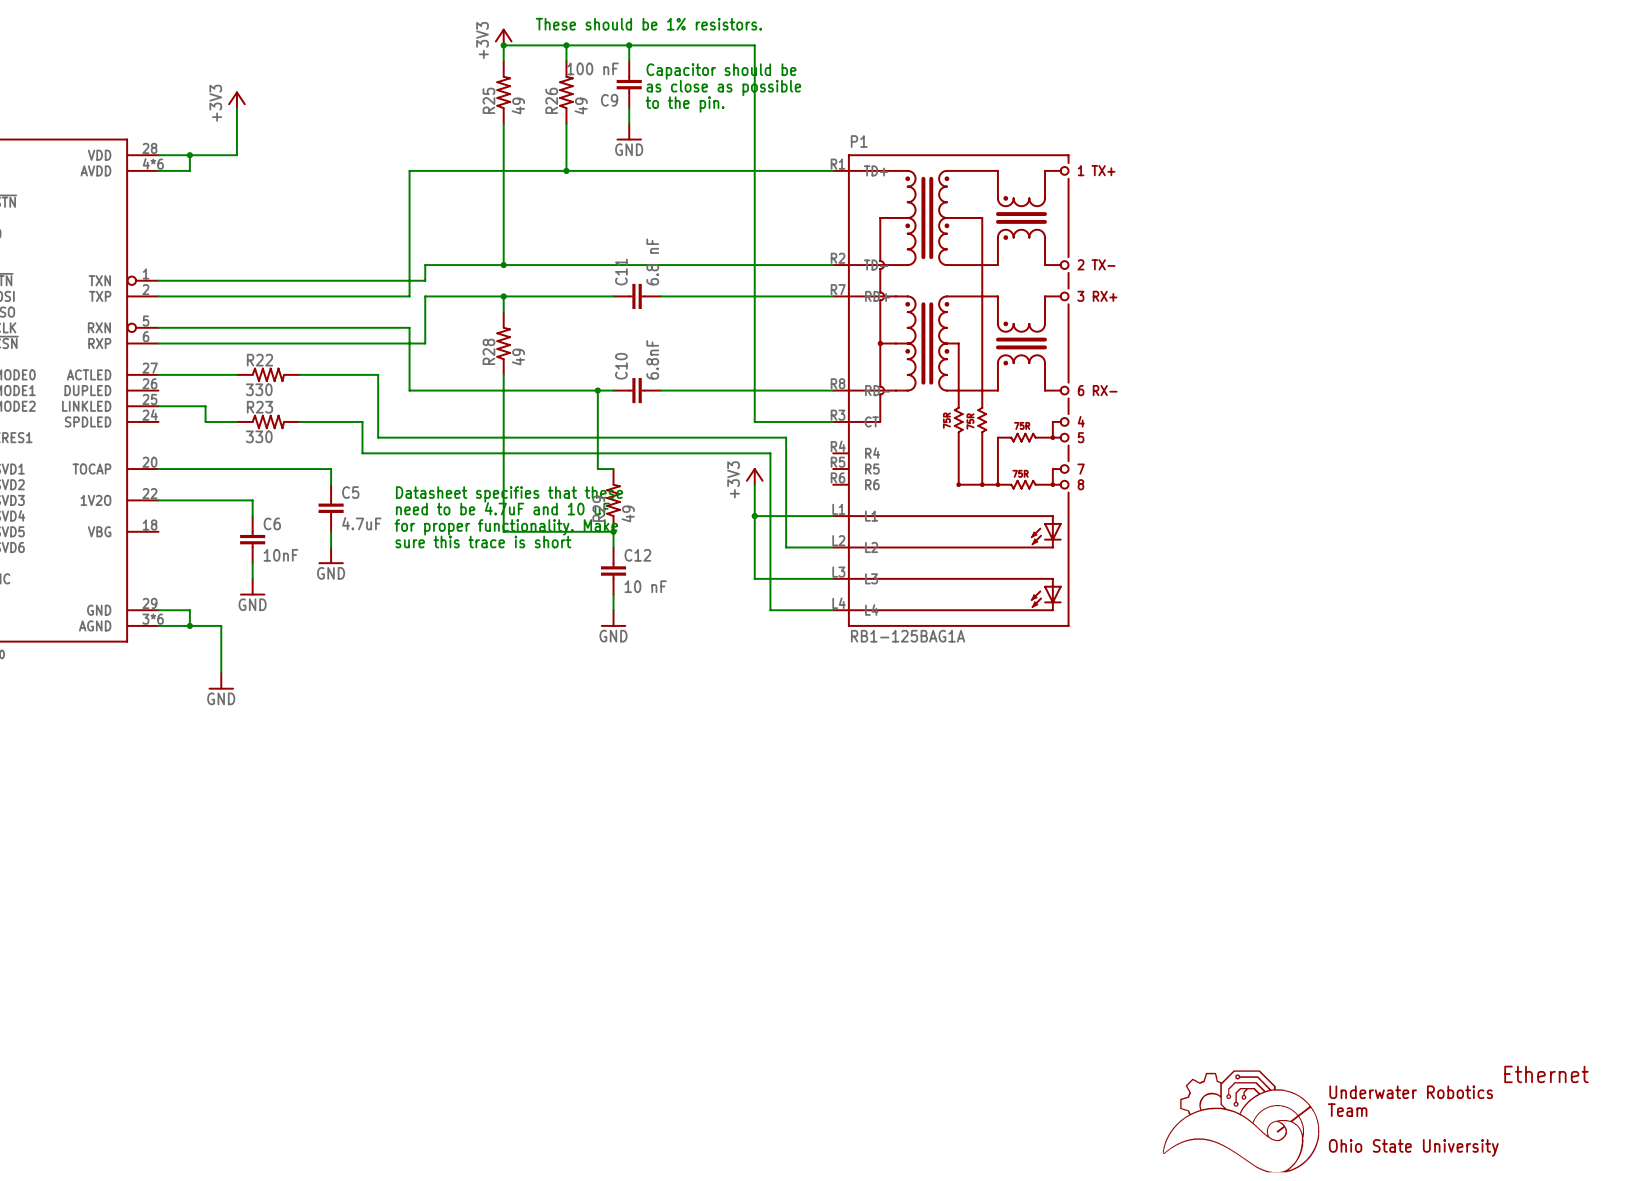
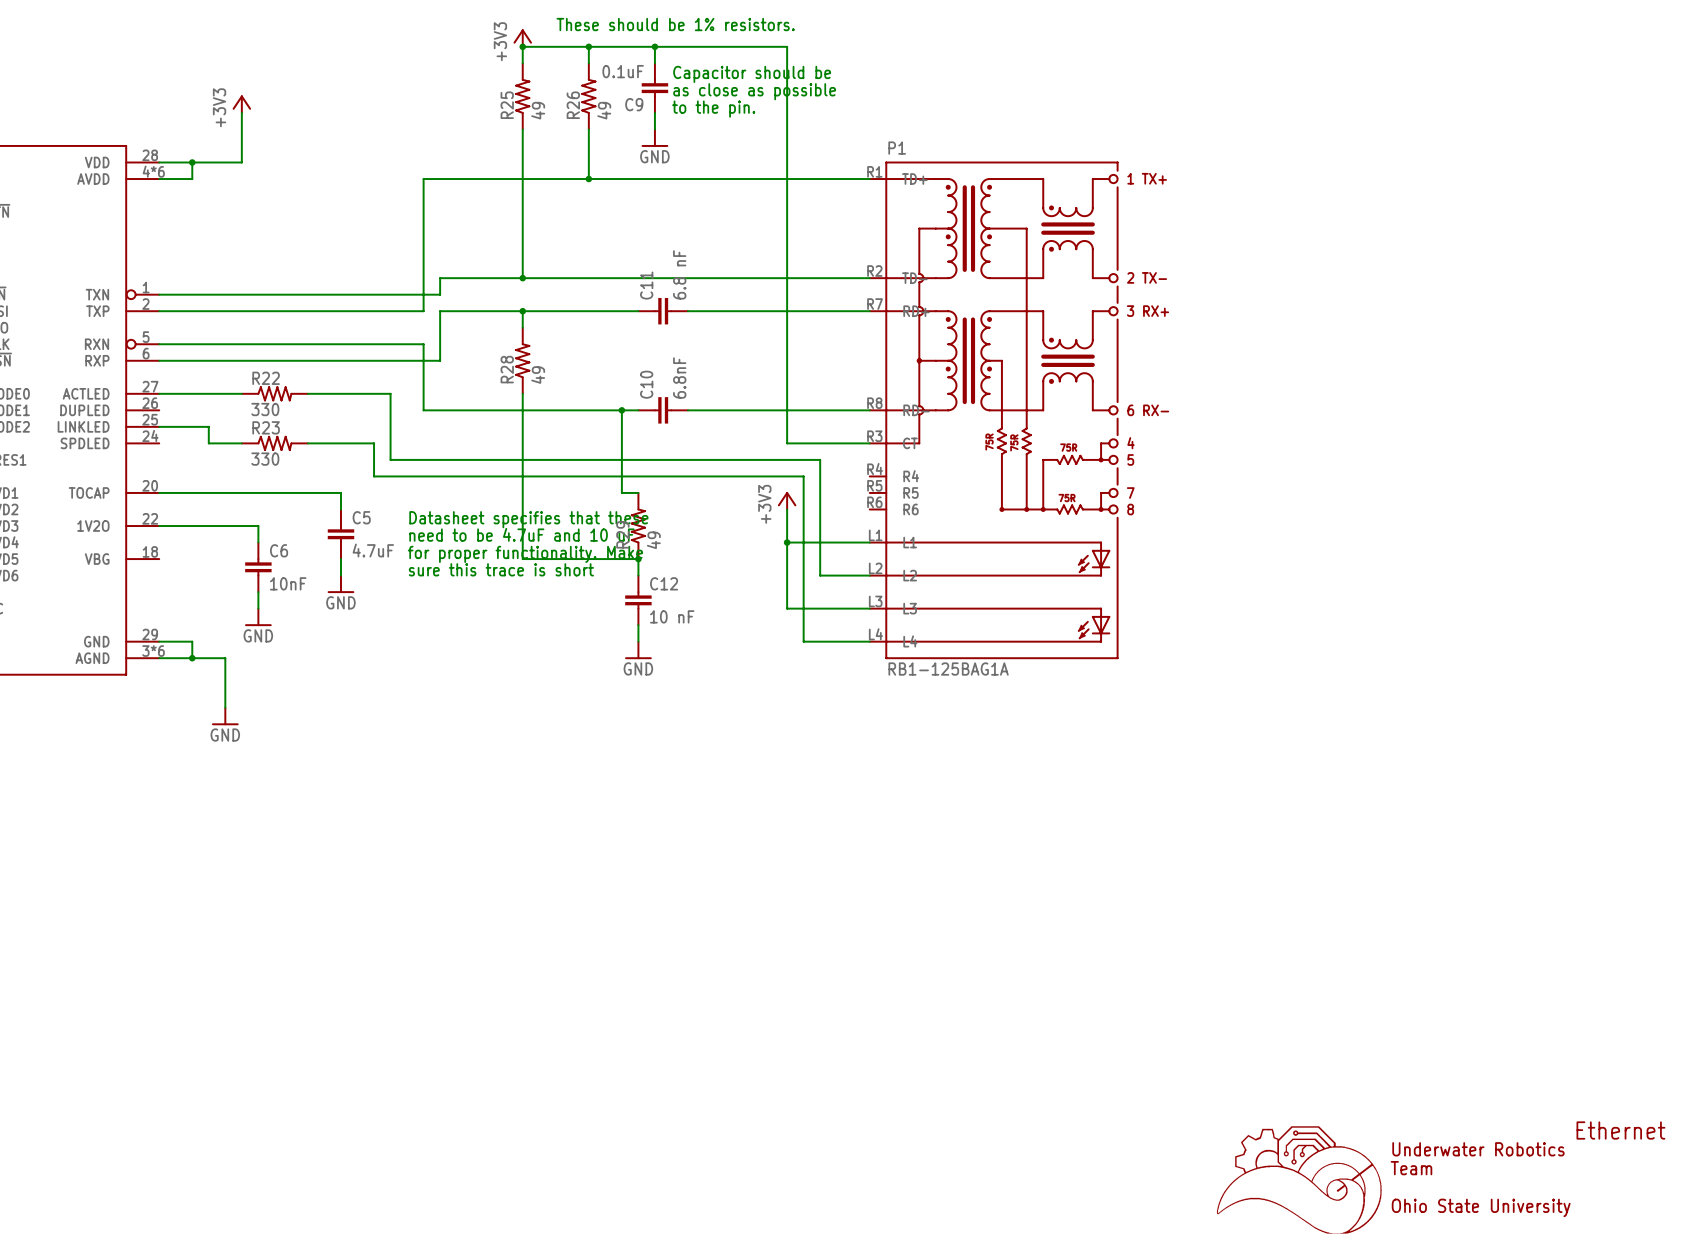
C9 value: 100 nF (592, 68) -> 0.1uF (623, 71)

